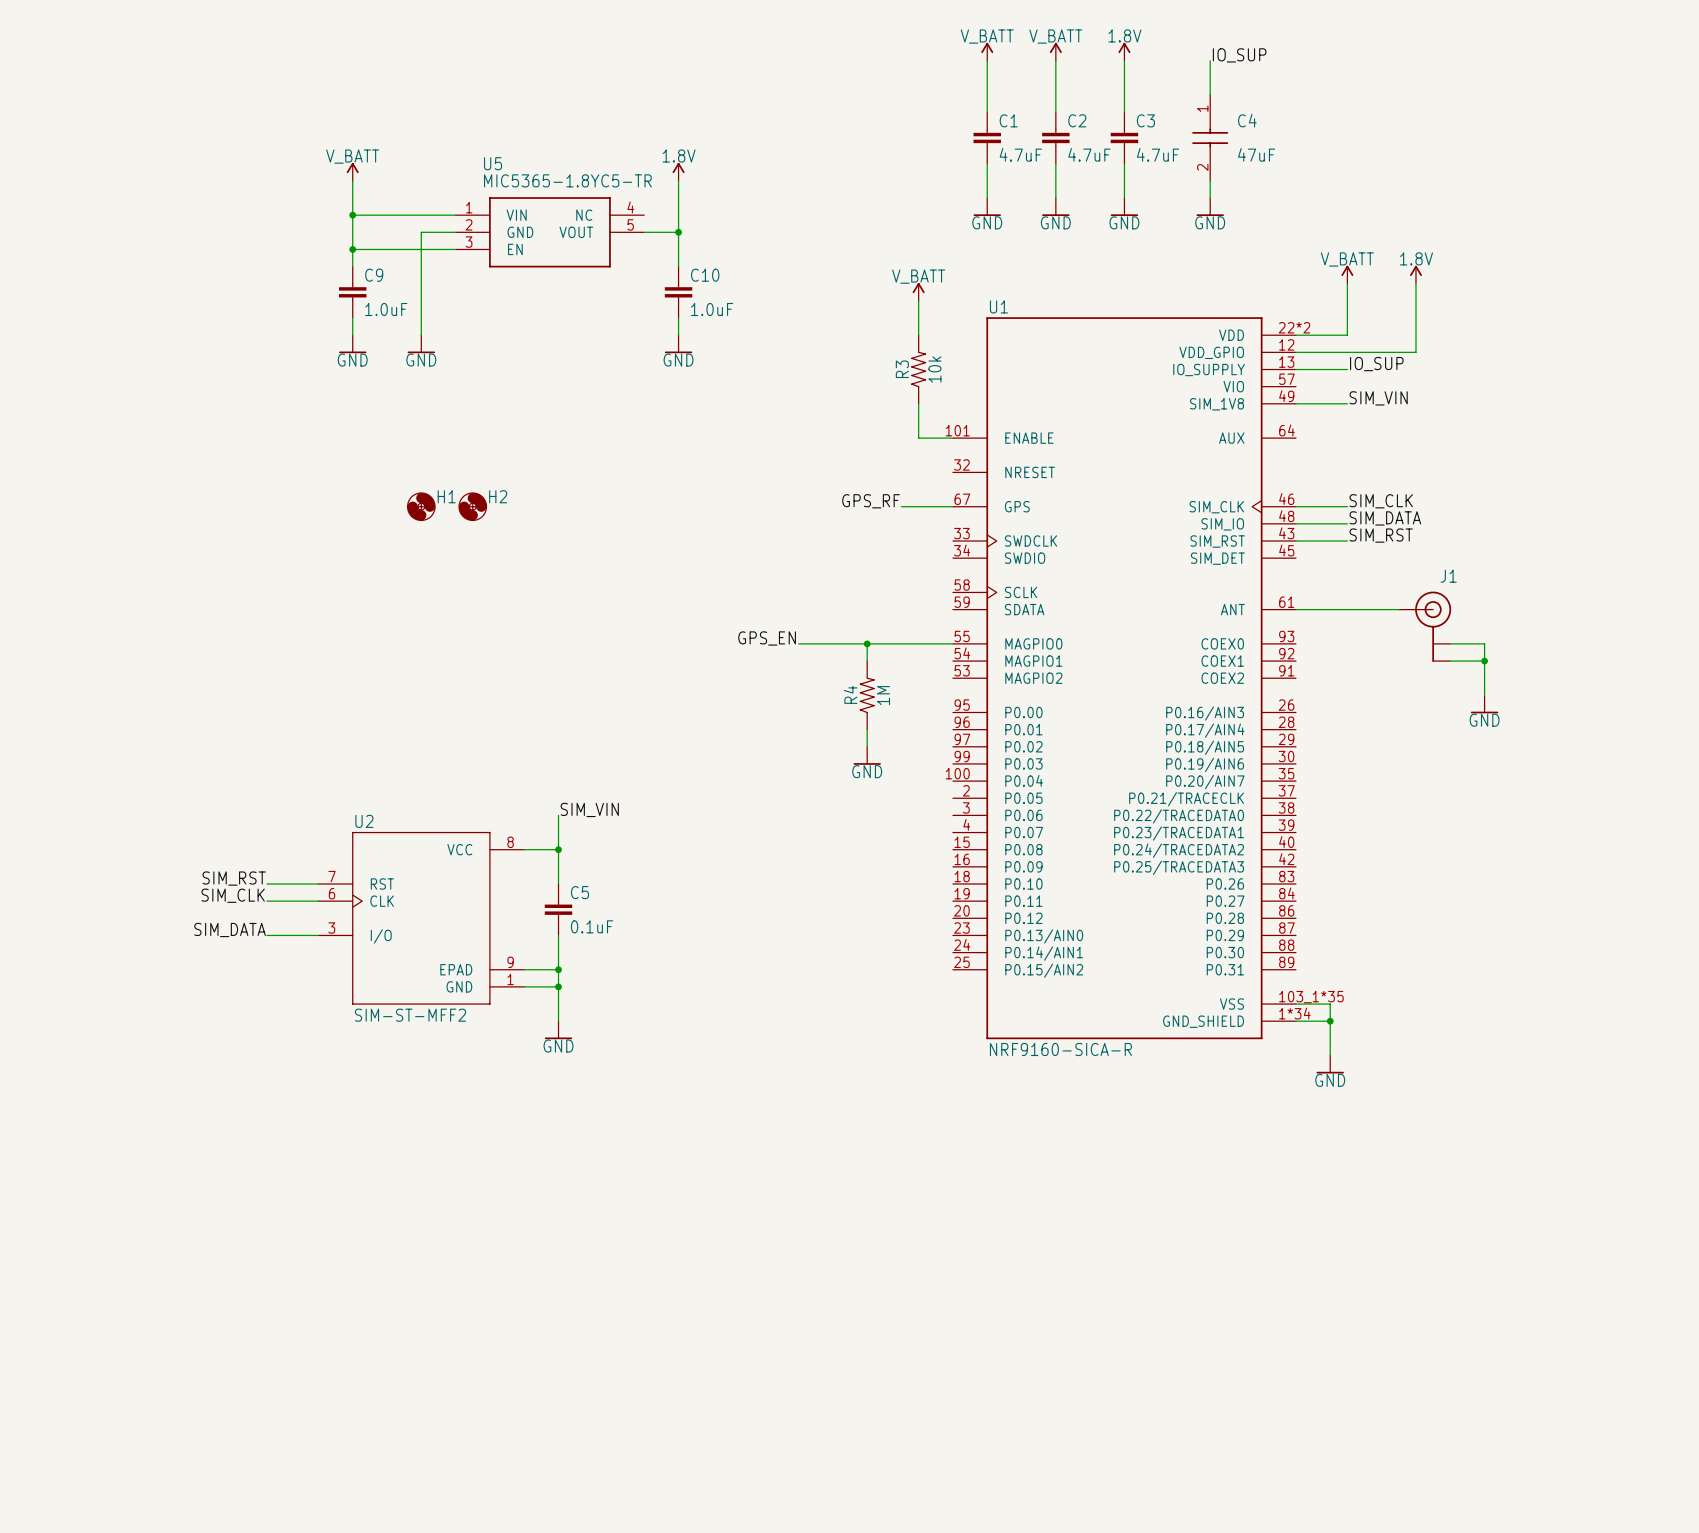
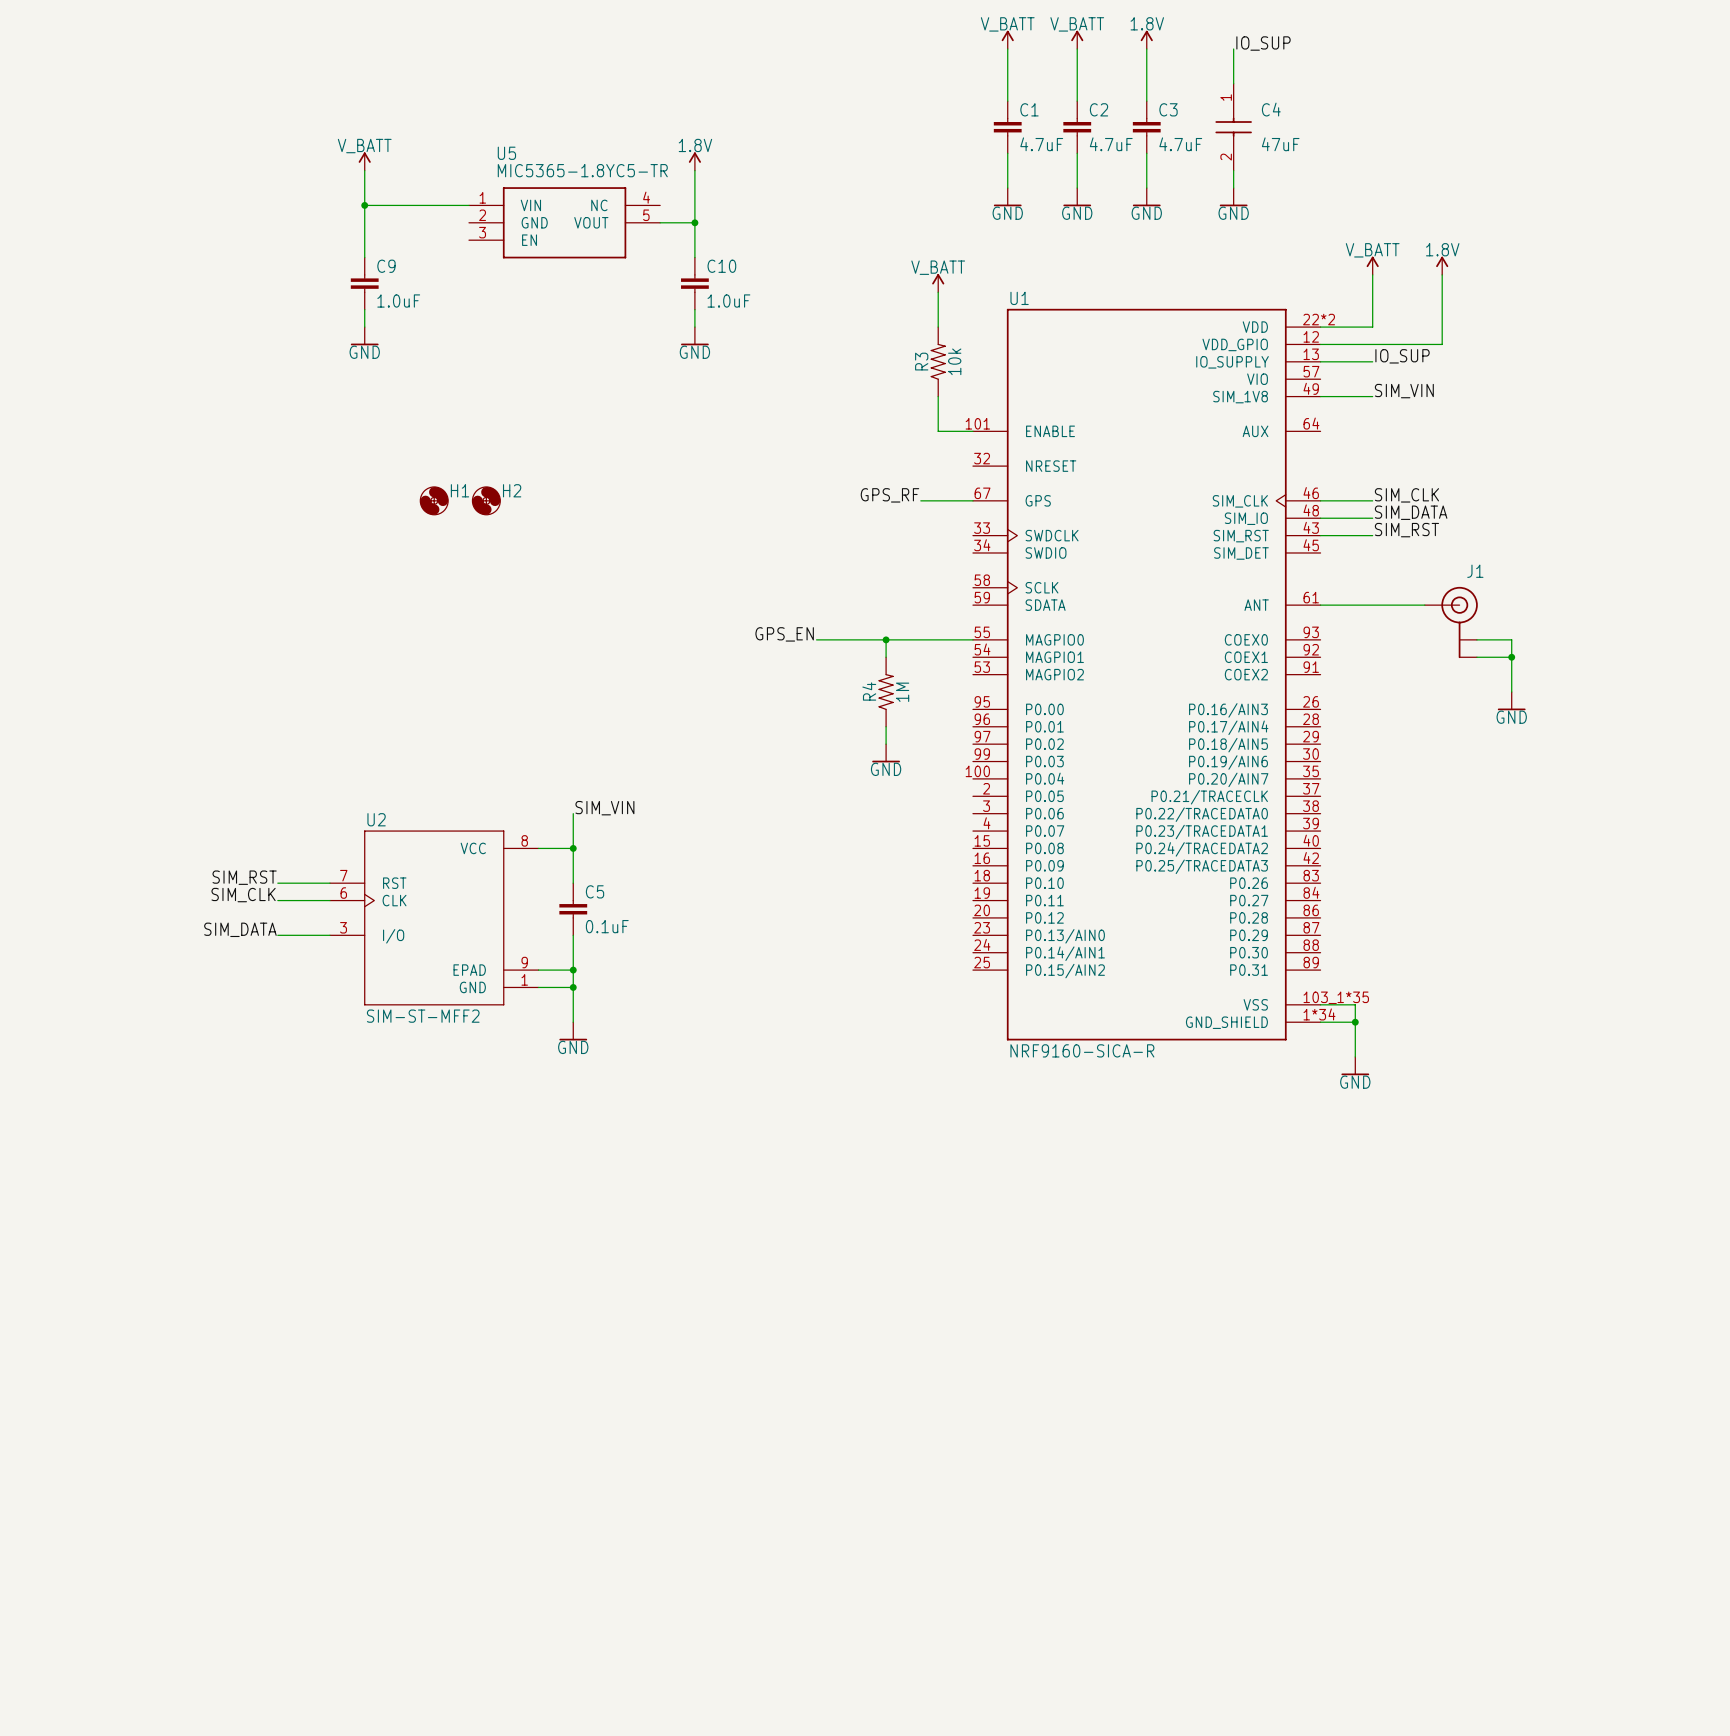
wire: (455, 232) (421, 232) (421, 335) -> none
wire: (352, 249) (455, 249) -> none
junction: (352, 249) -> none
power symbol: GND (421, 344) -> none

